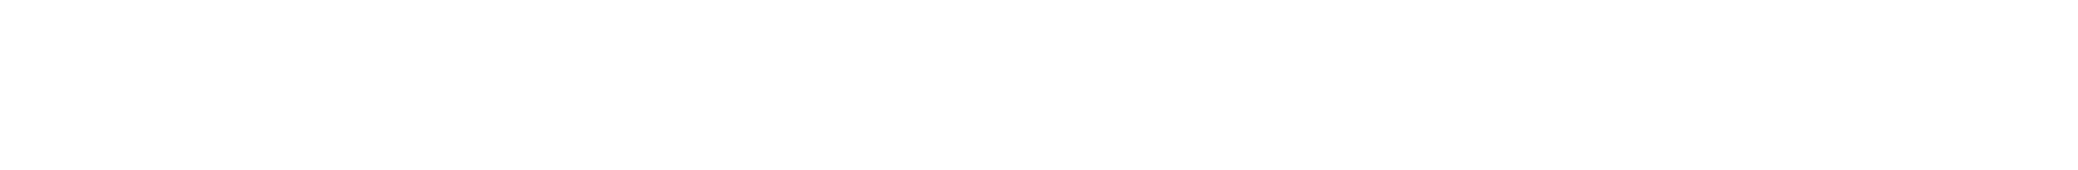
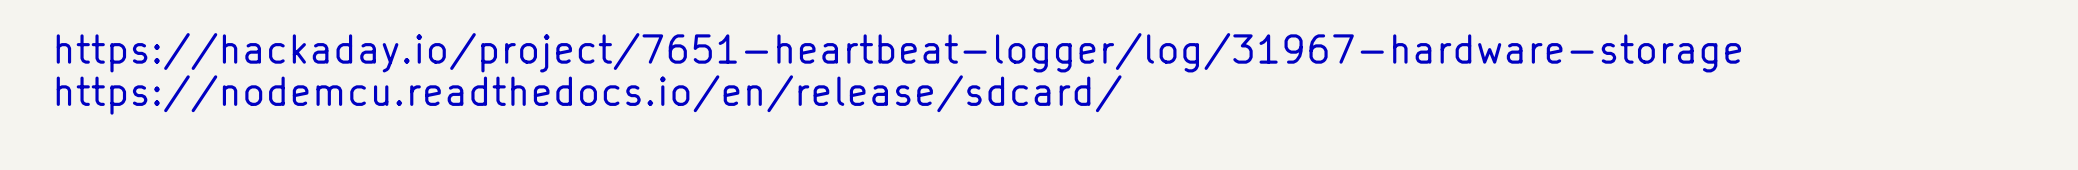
text: none -> https://hackaday.io/project/7651-heartbeat-logger/log/31967-hardware-storage (898, 52)
text: none -> https://nodemcu.readthedocs.io/en/release/sdcard/ (589, 94)

